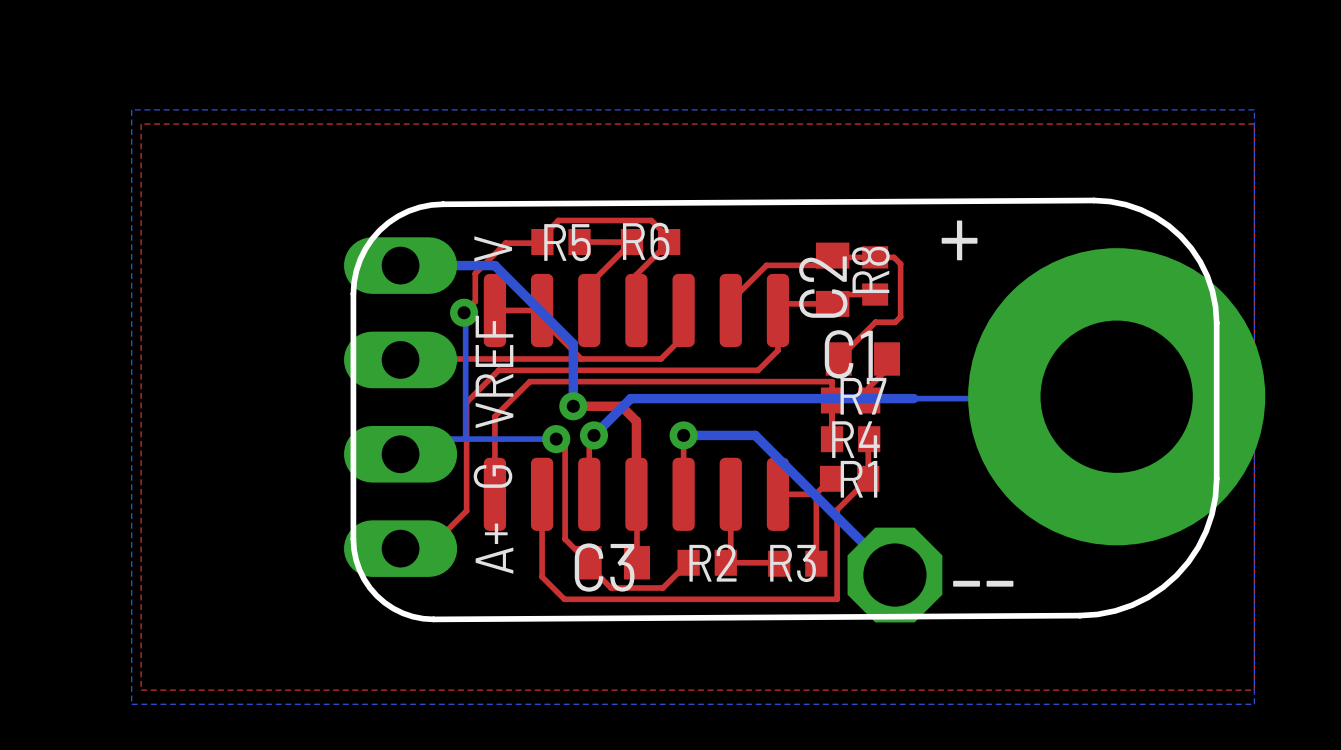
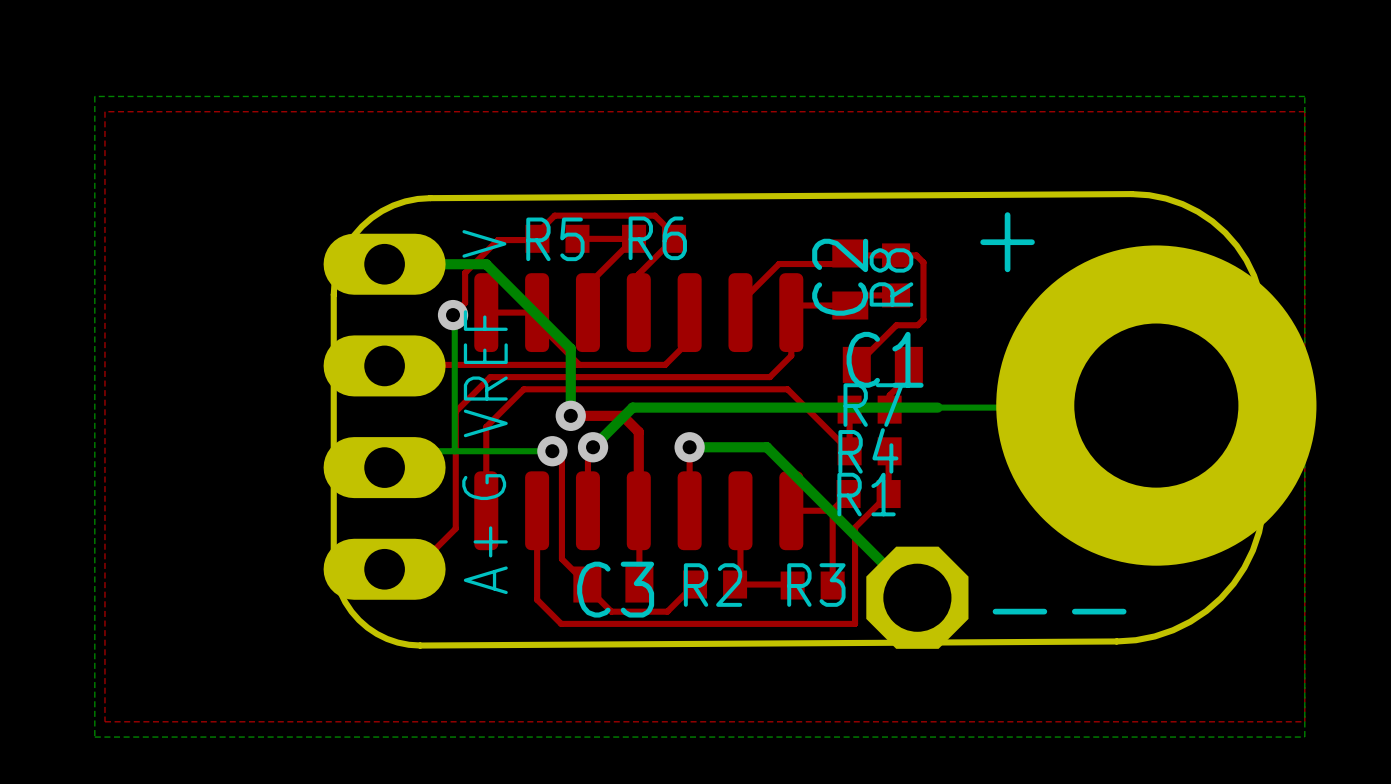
top track: (774, 381) (832, 381) (832, 400) -> (787, 389) (849, 451)

